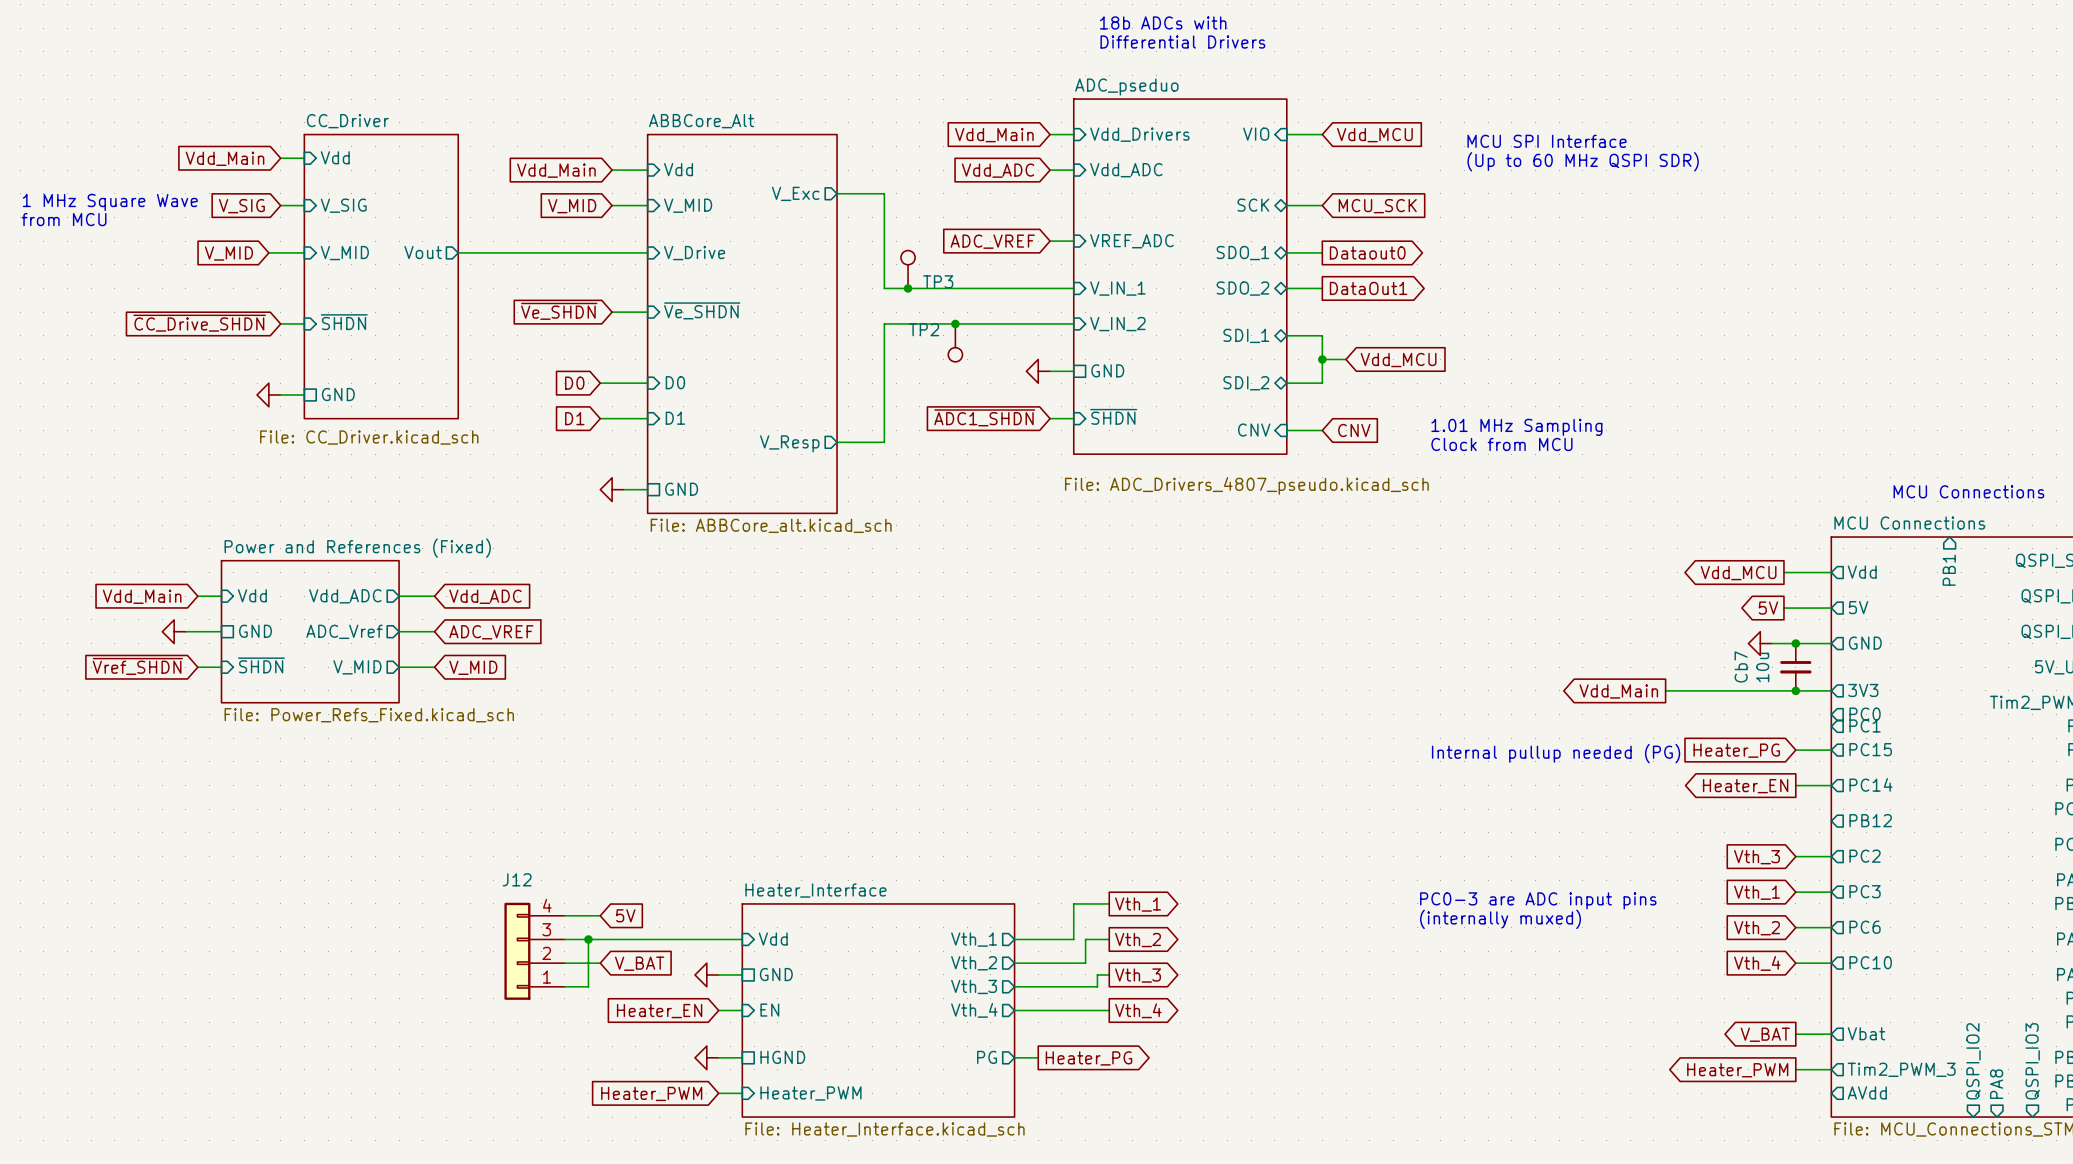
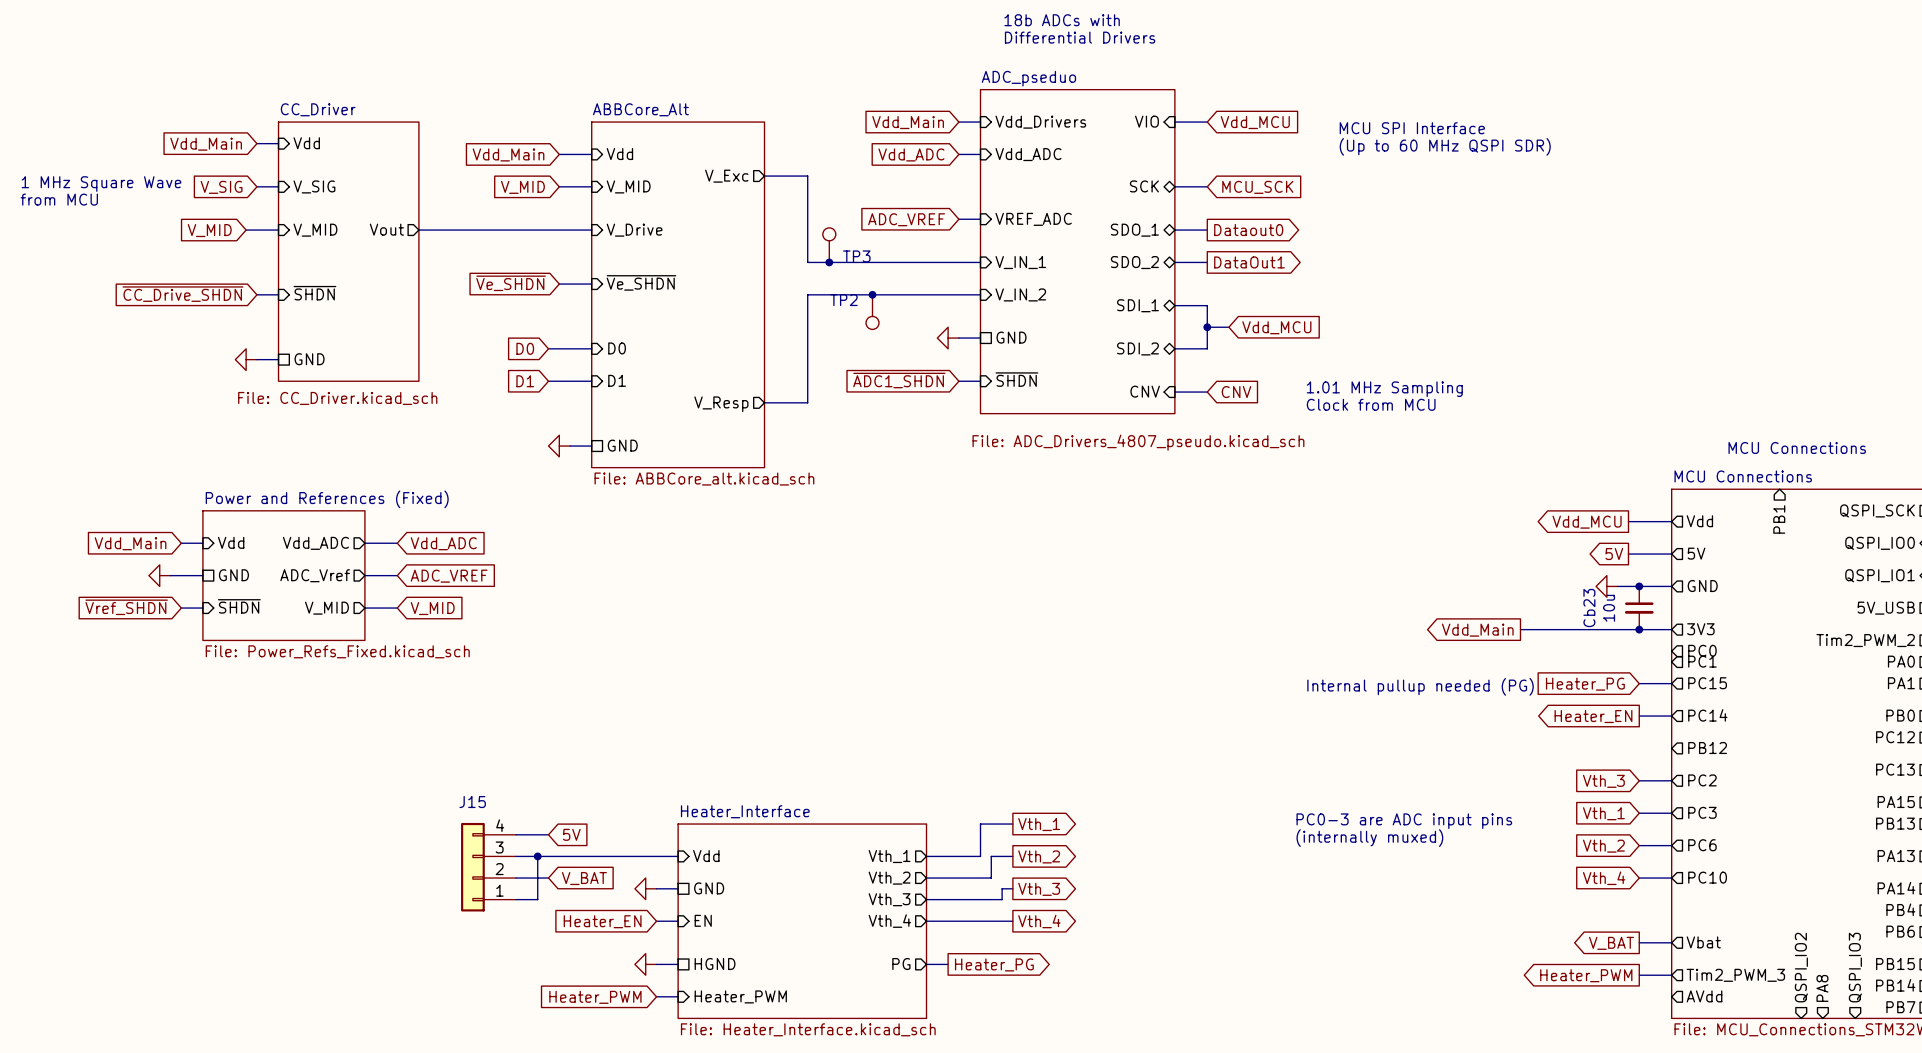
Cb7 name: Cb7 (1741, 666) -> Cb23 (1589, 608)
J12 name: J12 (517, 879) -> J15 (472, 802)

